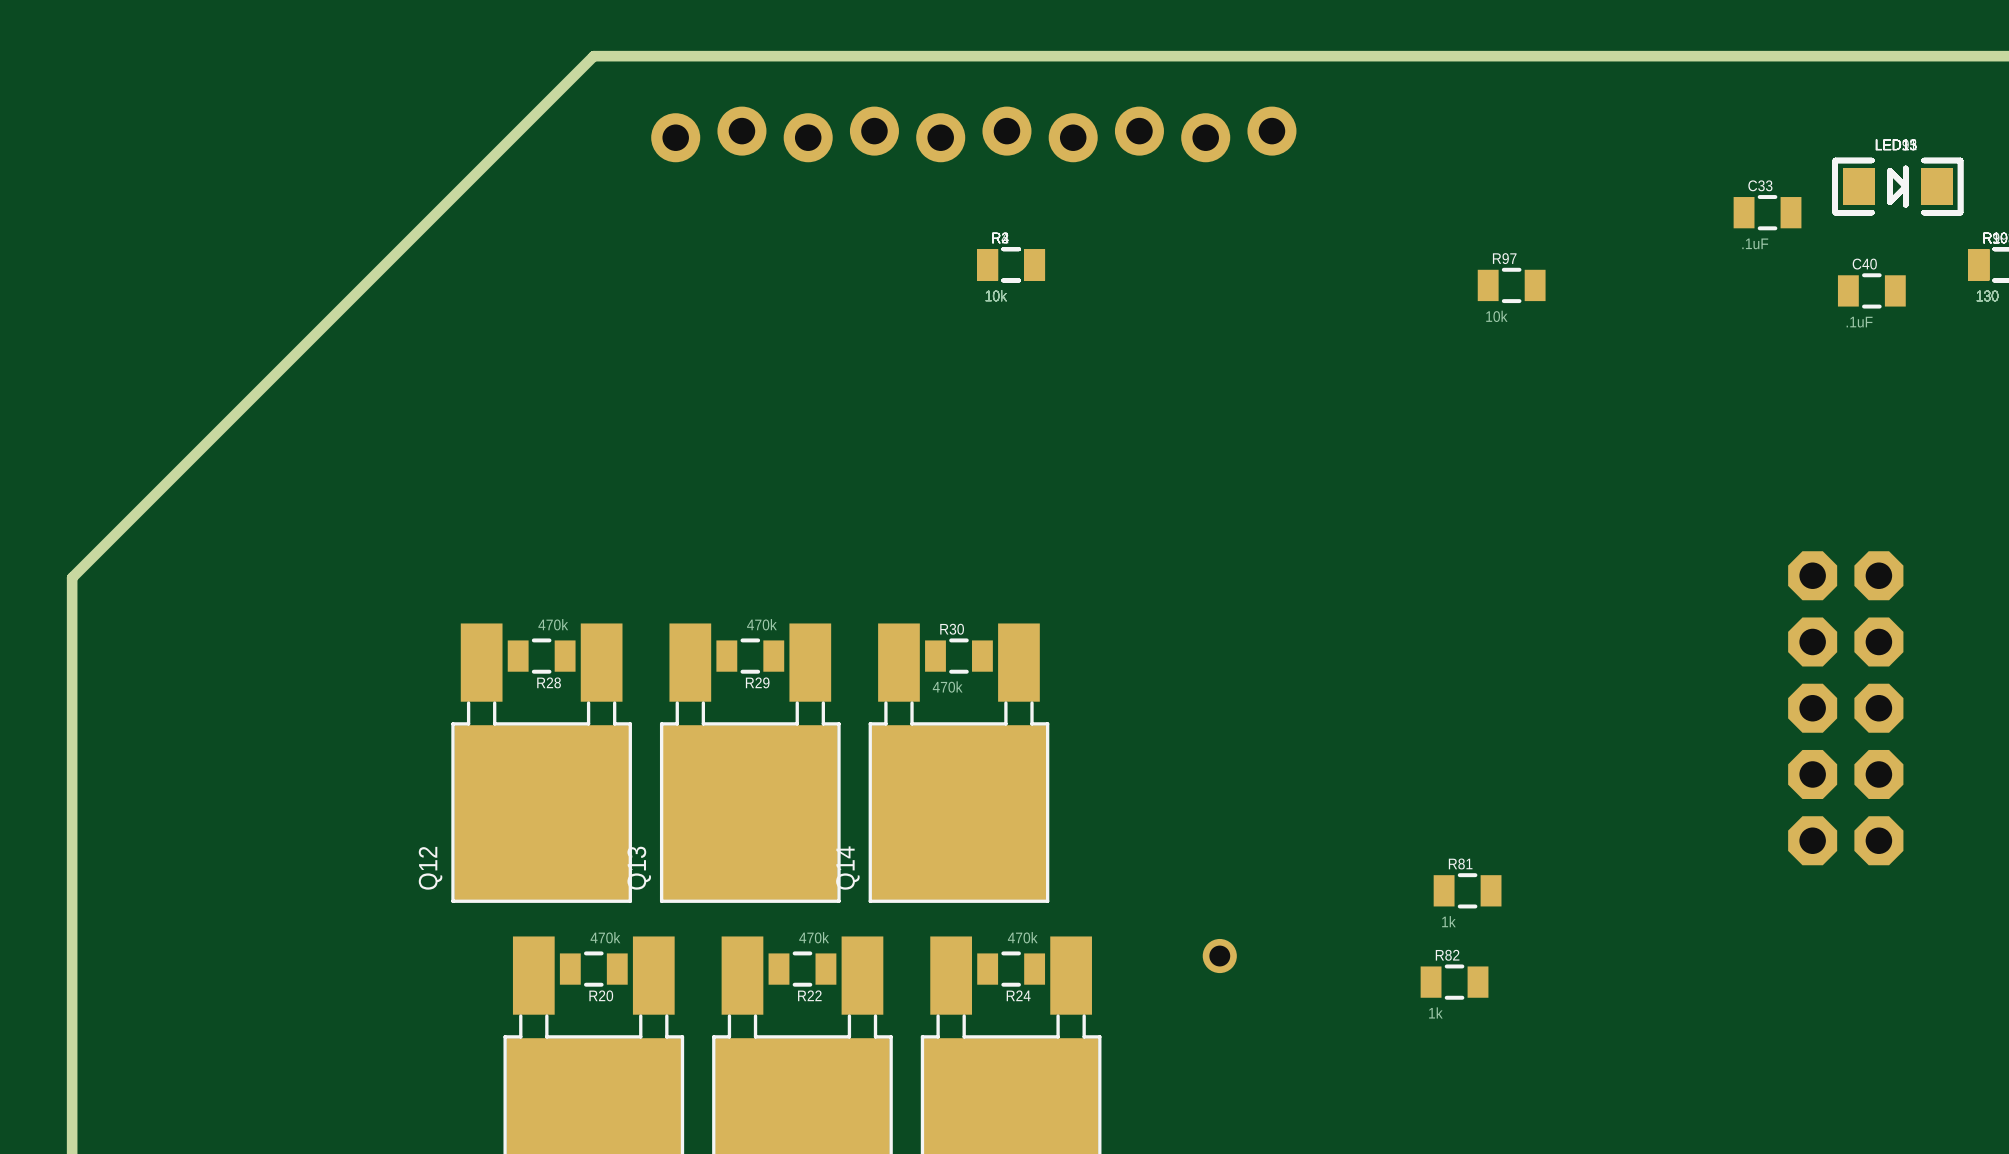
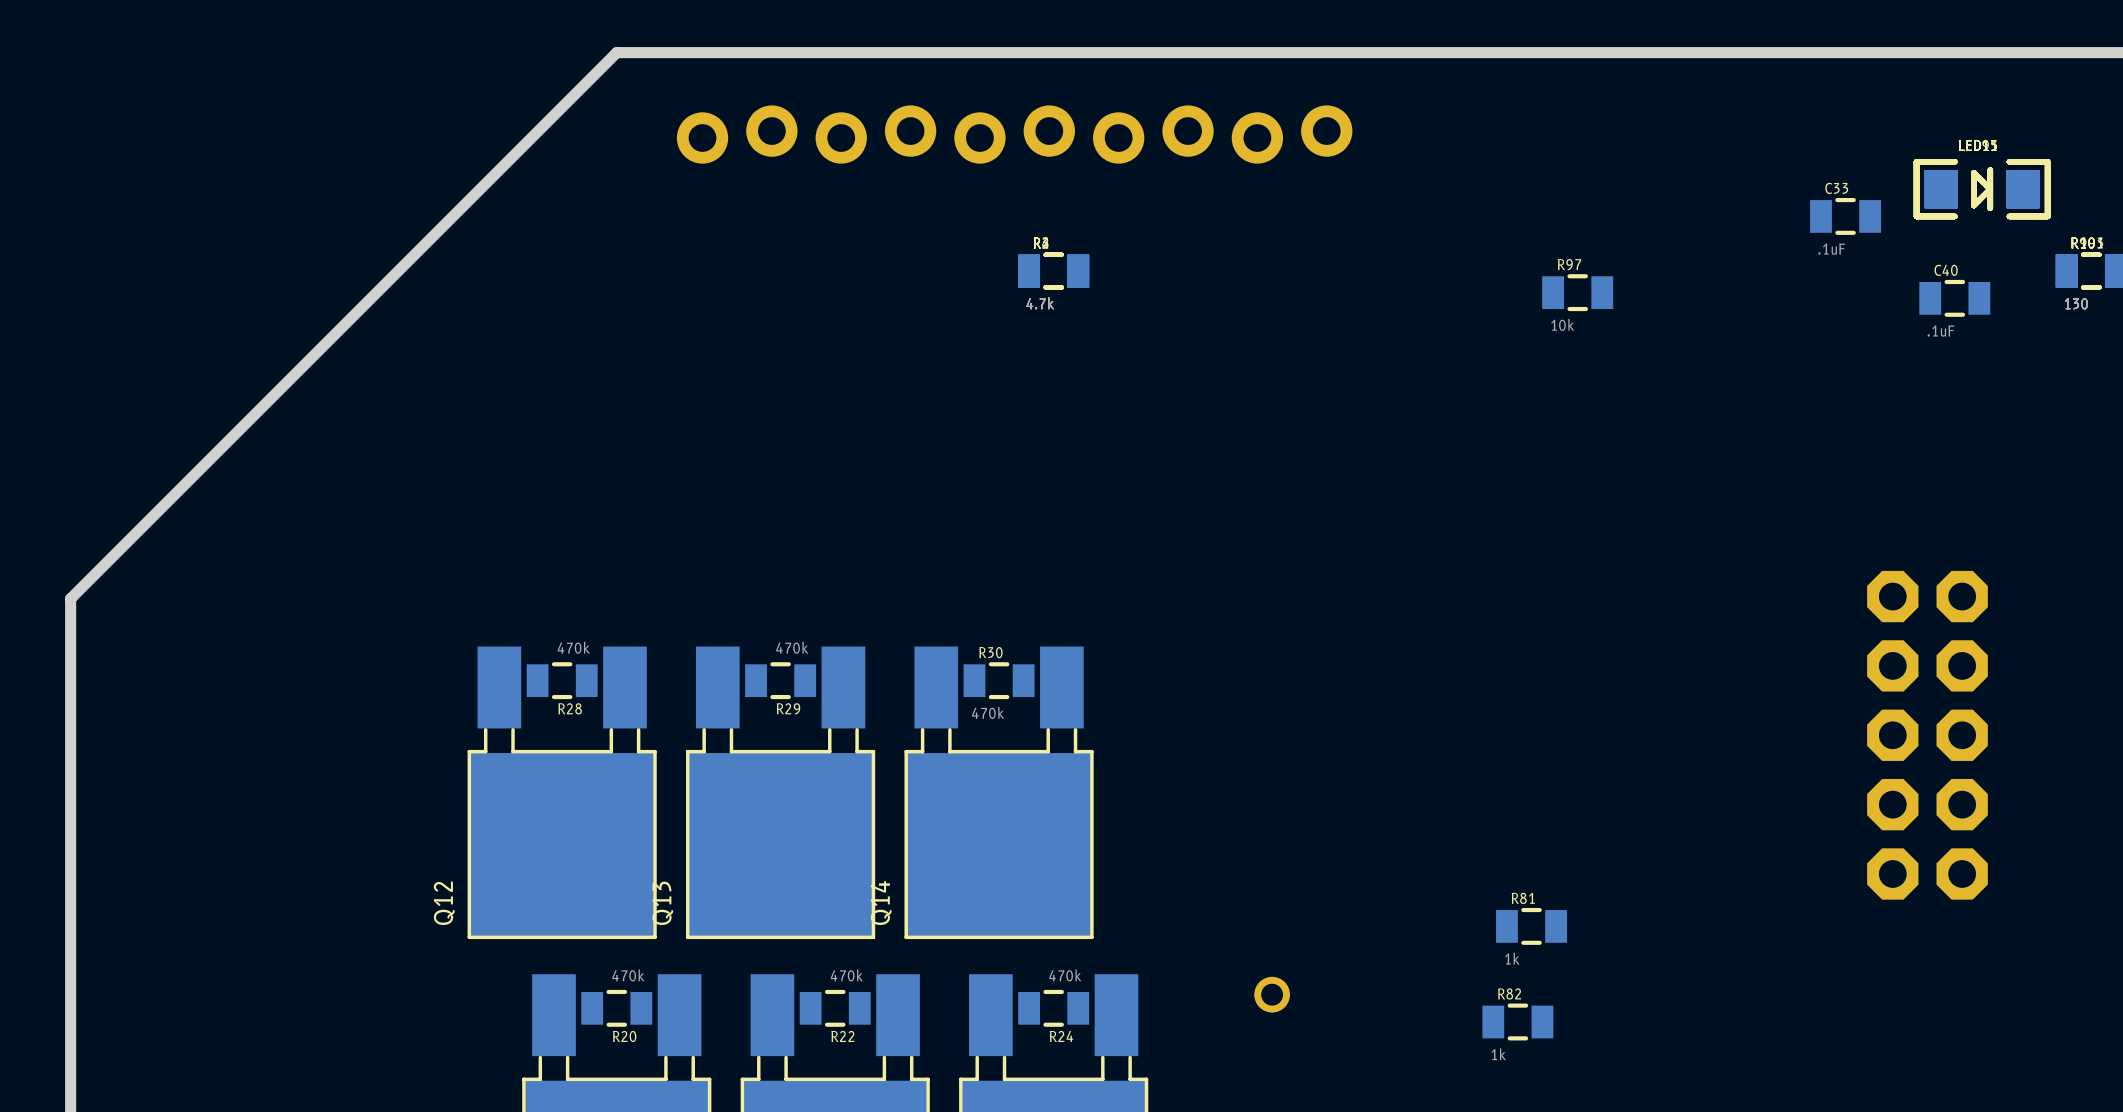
part value: 10k (996, 295) -> 4.7k (1040, 303)
part value: 10k (996, 295) -> 4.7k (1040, 303)
part value: 10k (996, 295) -> 4.7k (1040, 303)

